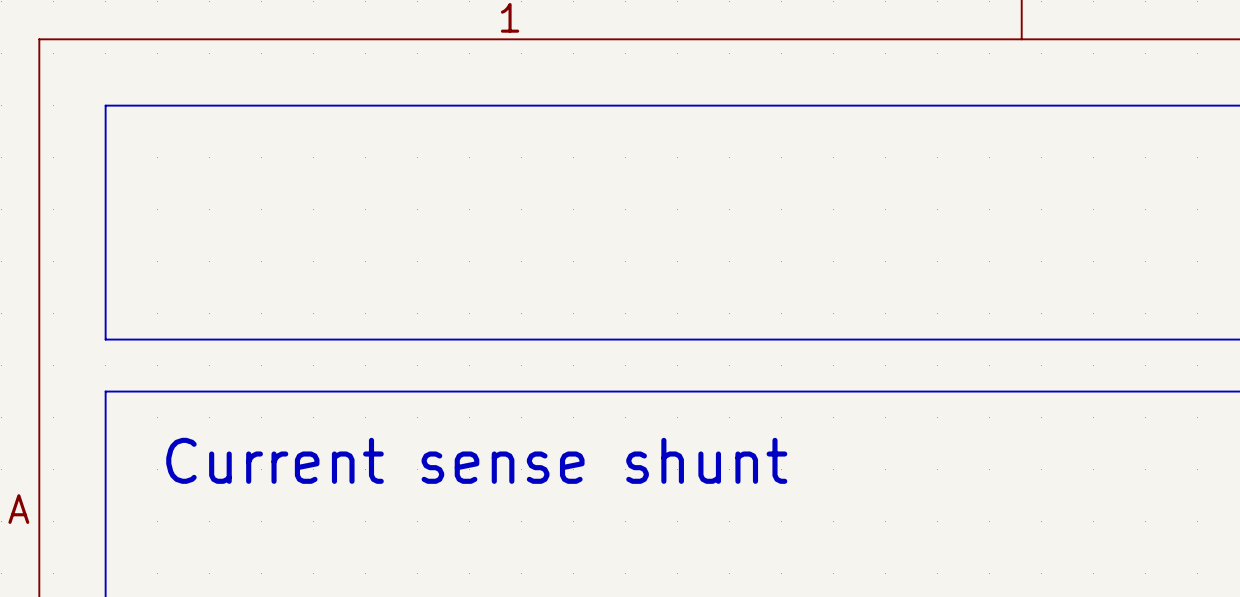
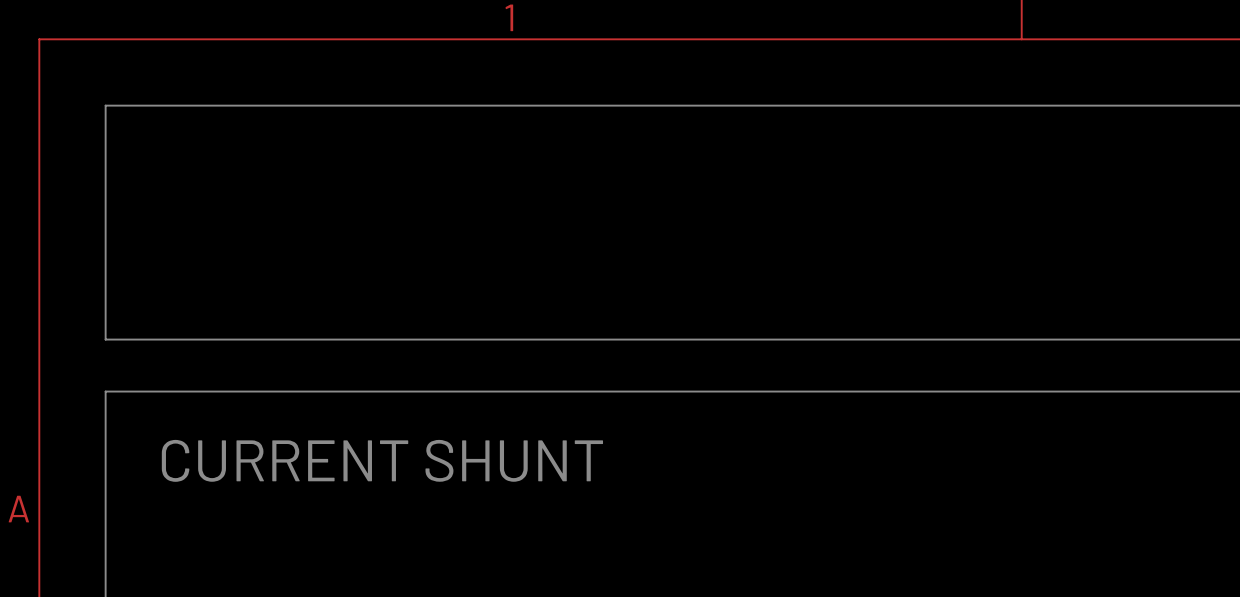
text: Current sense shunt (476, 460) -> CURRENT SHUNT (382, 460)

